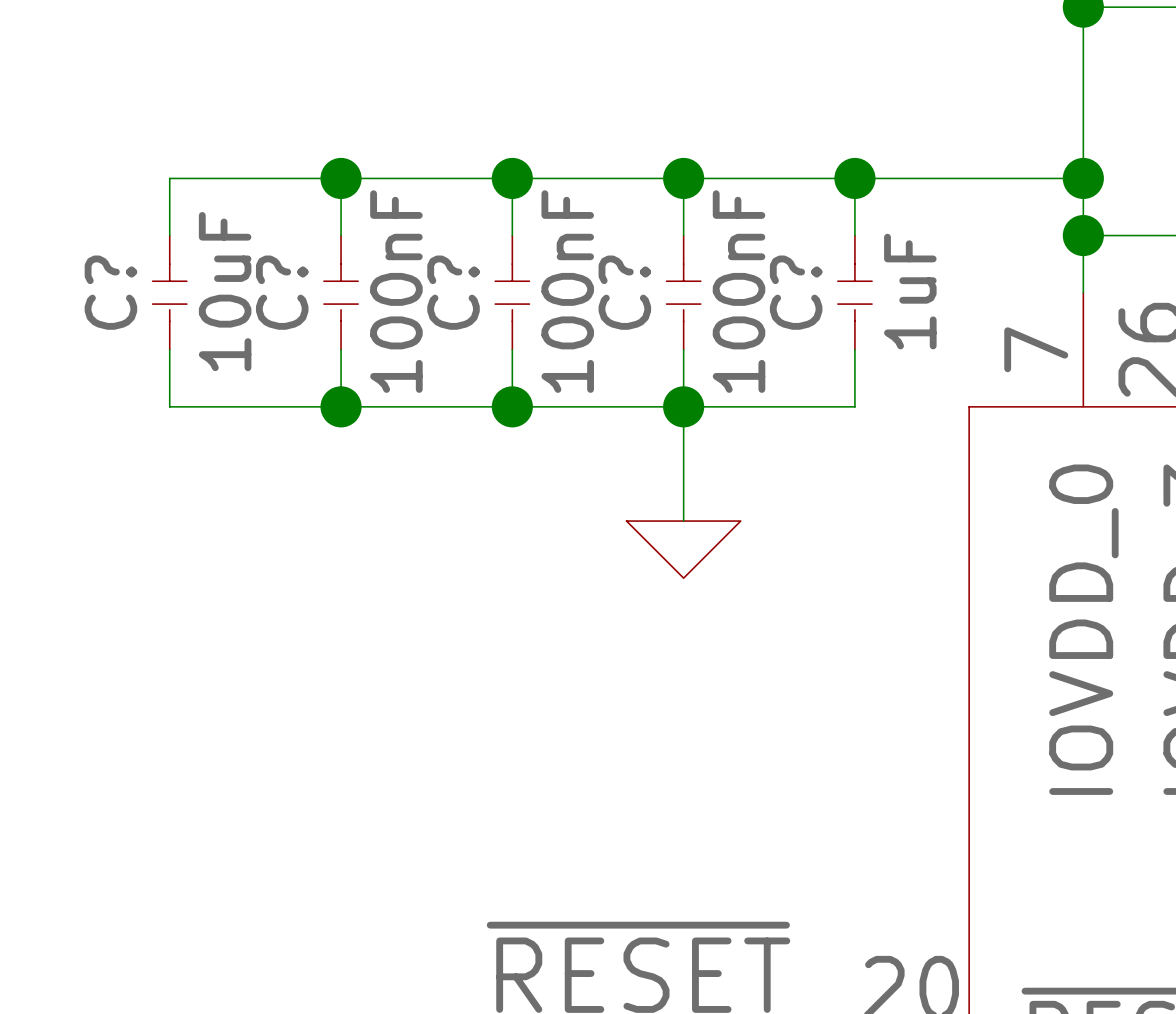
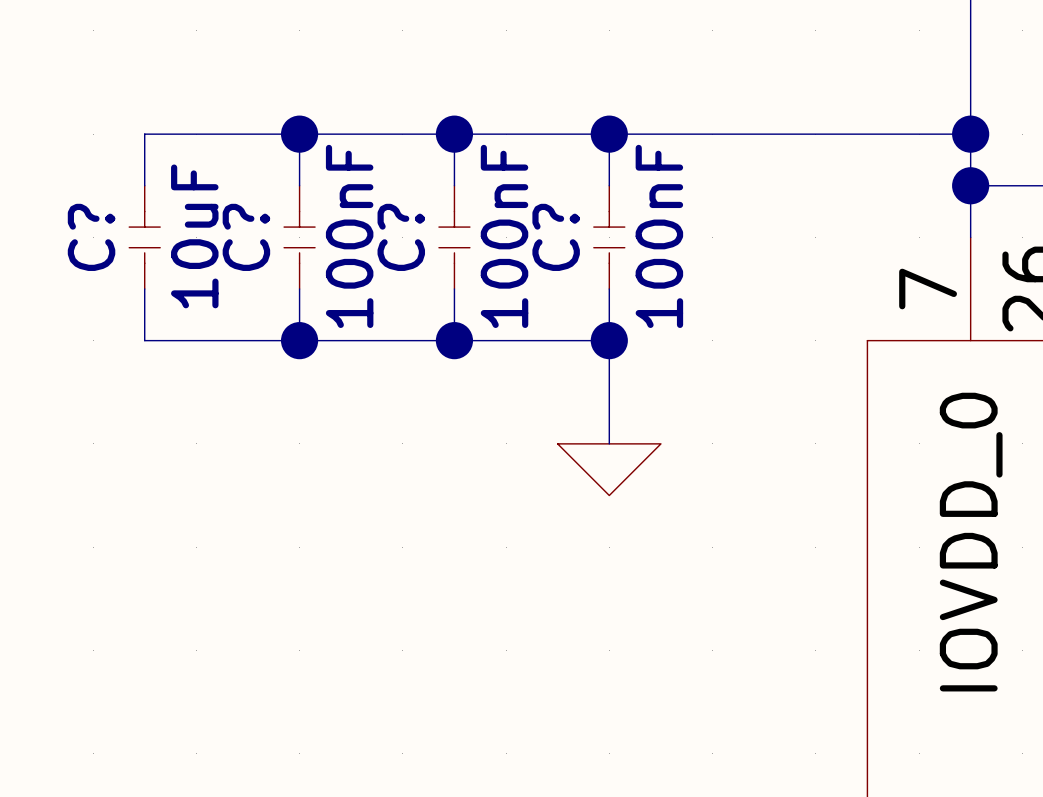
wire: (854, 178) (854, 235) -> none
junction: (854, 178) -> none
C?: 1uF (854, 292) -> none
wire: (854, 349) (854, 406) (683, 406) -> none

